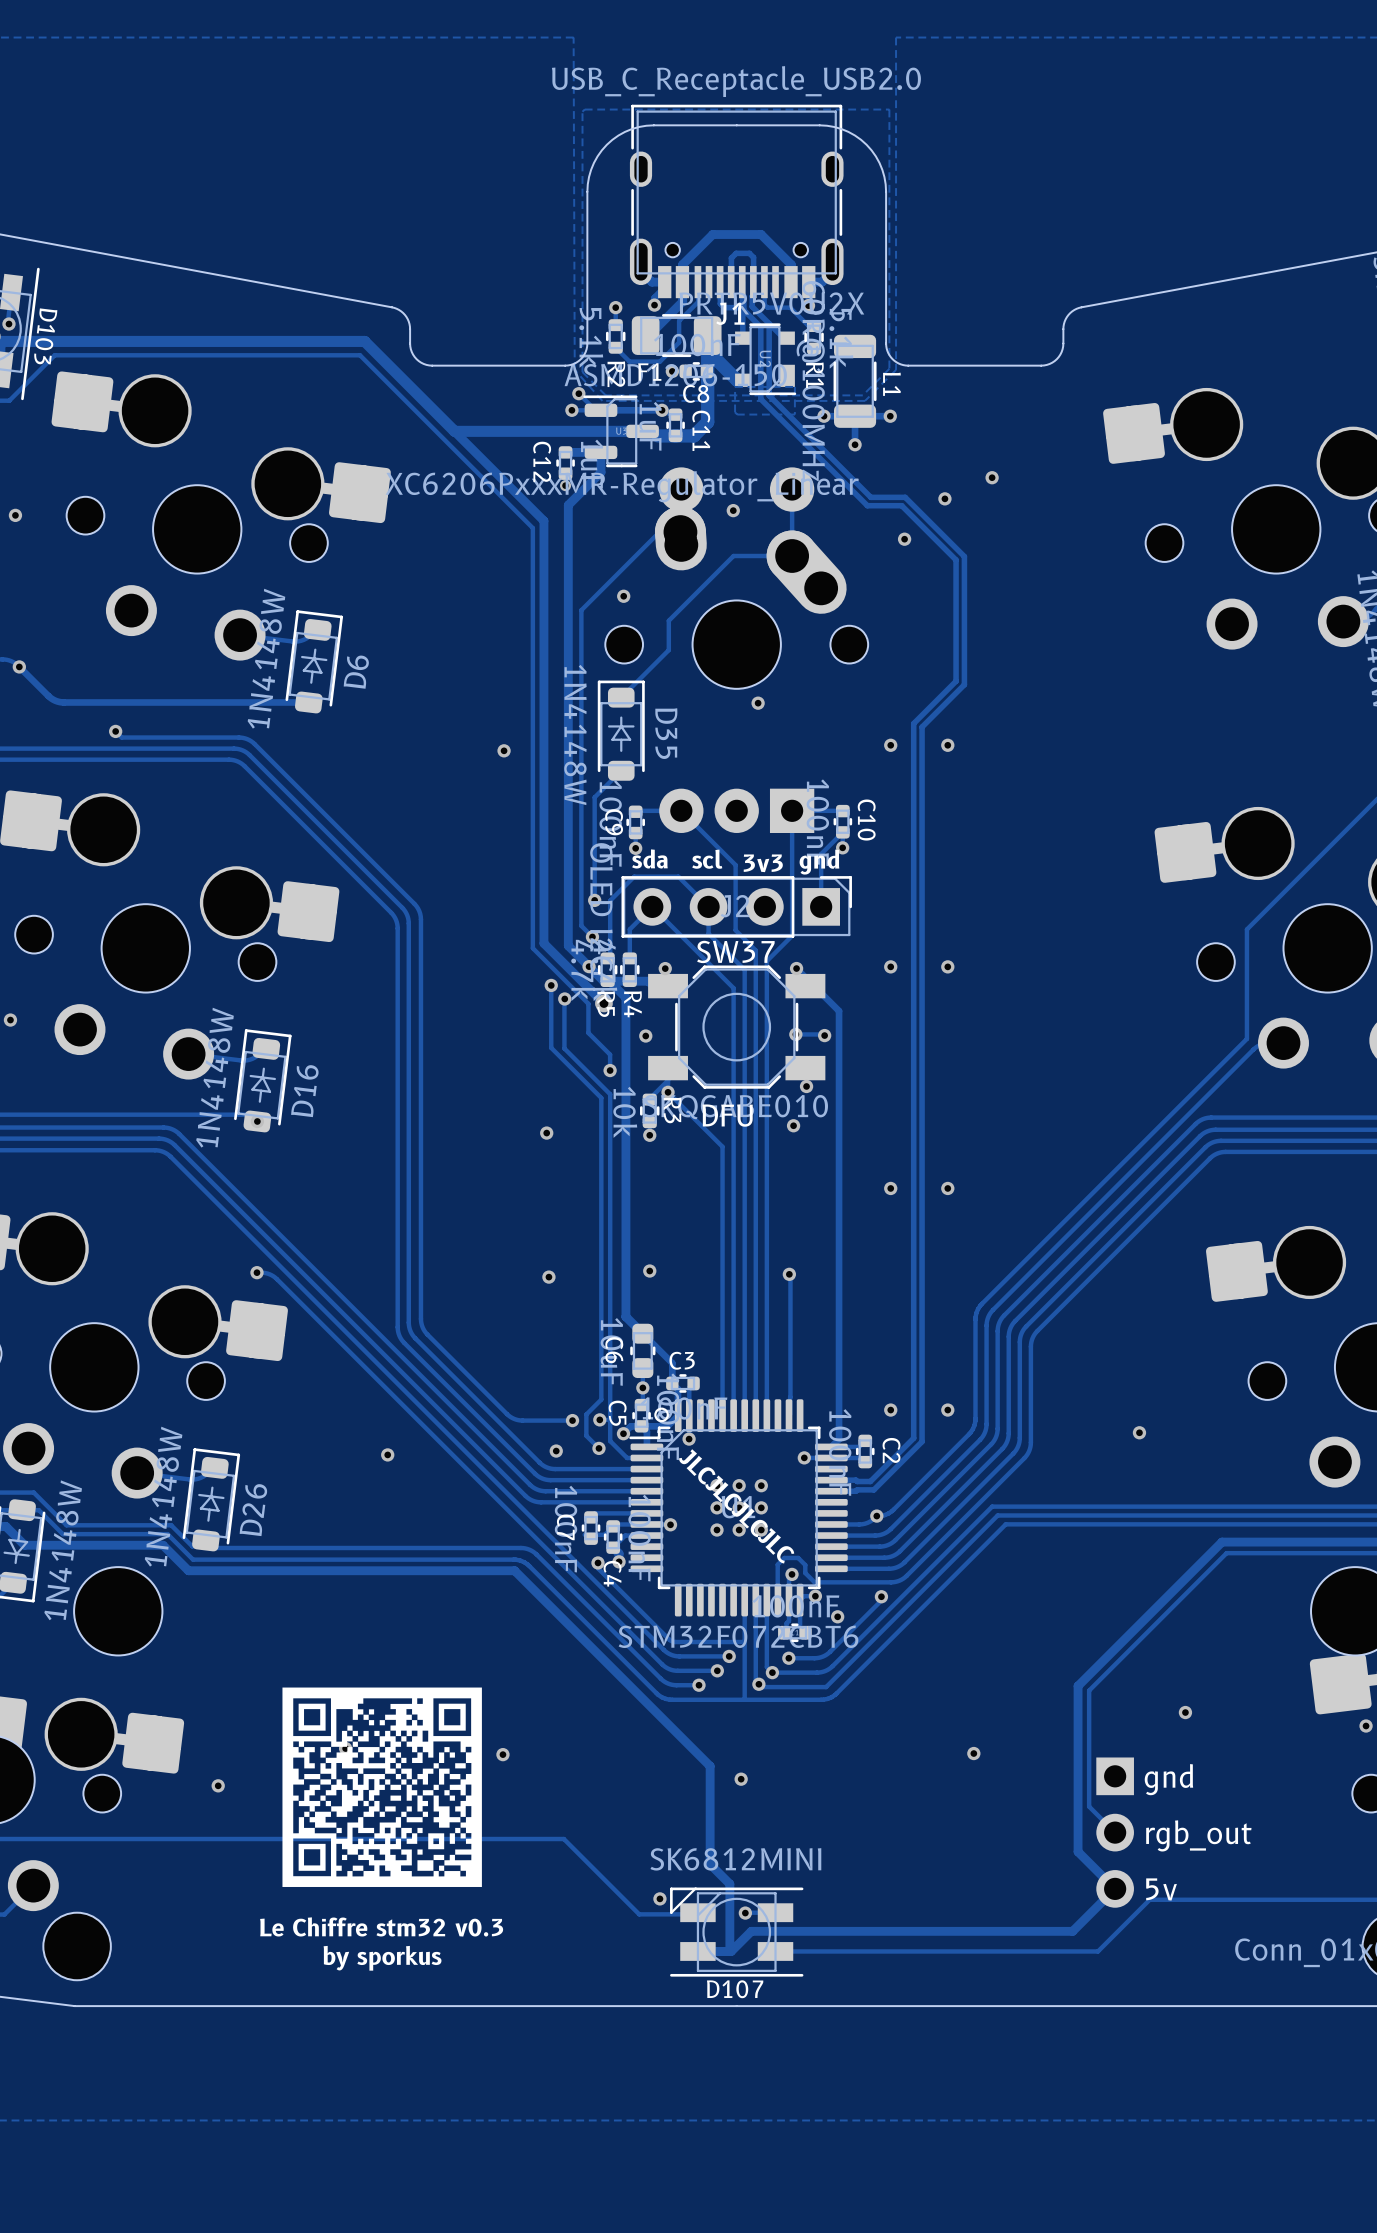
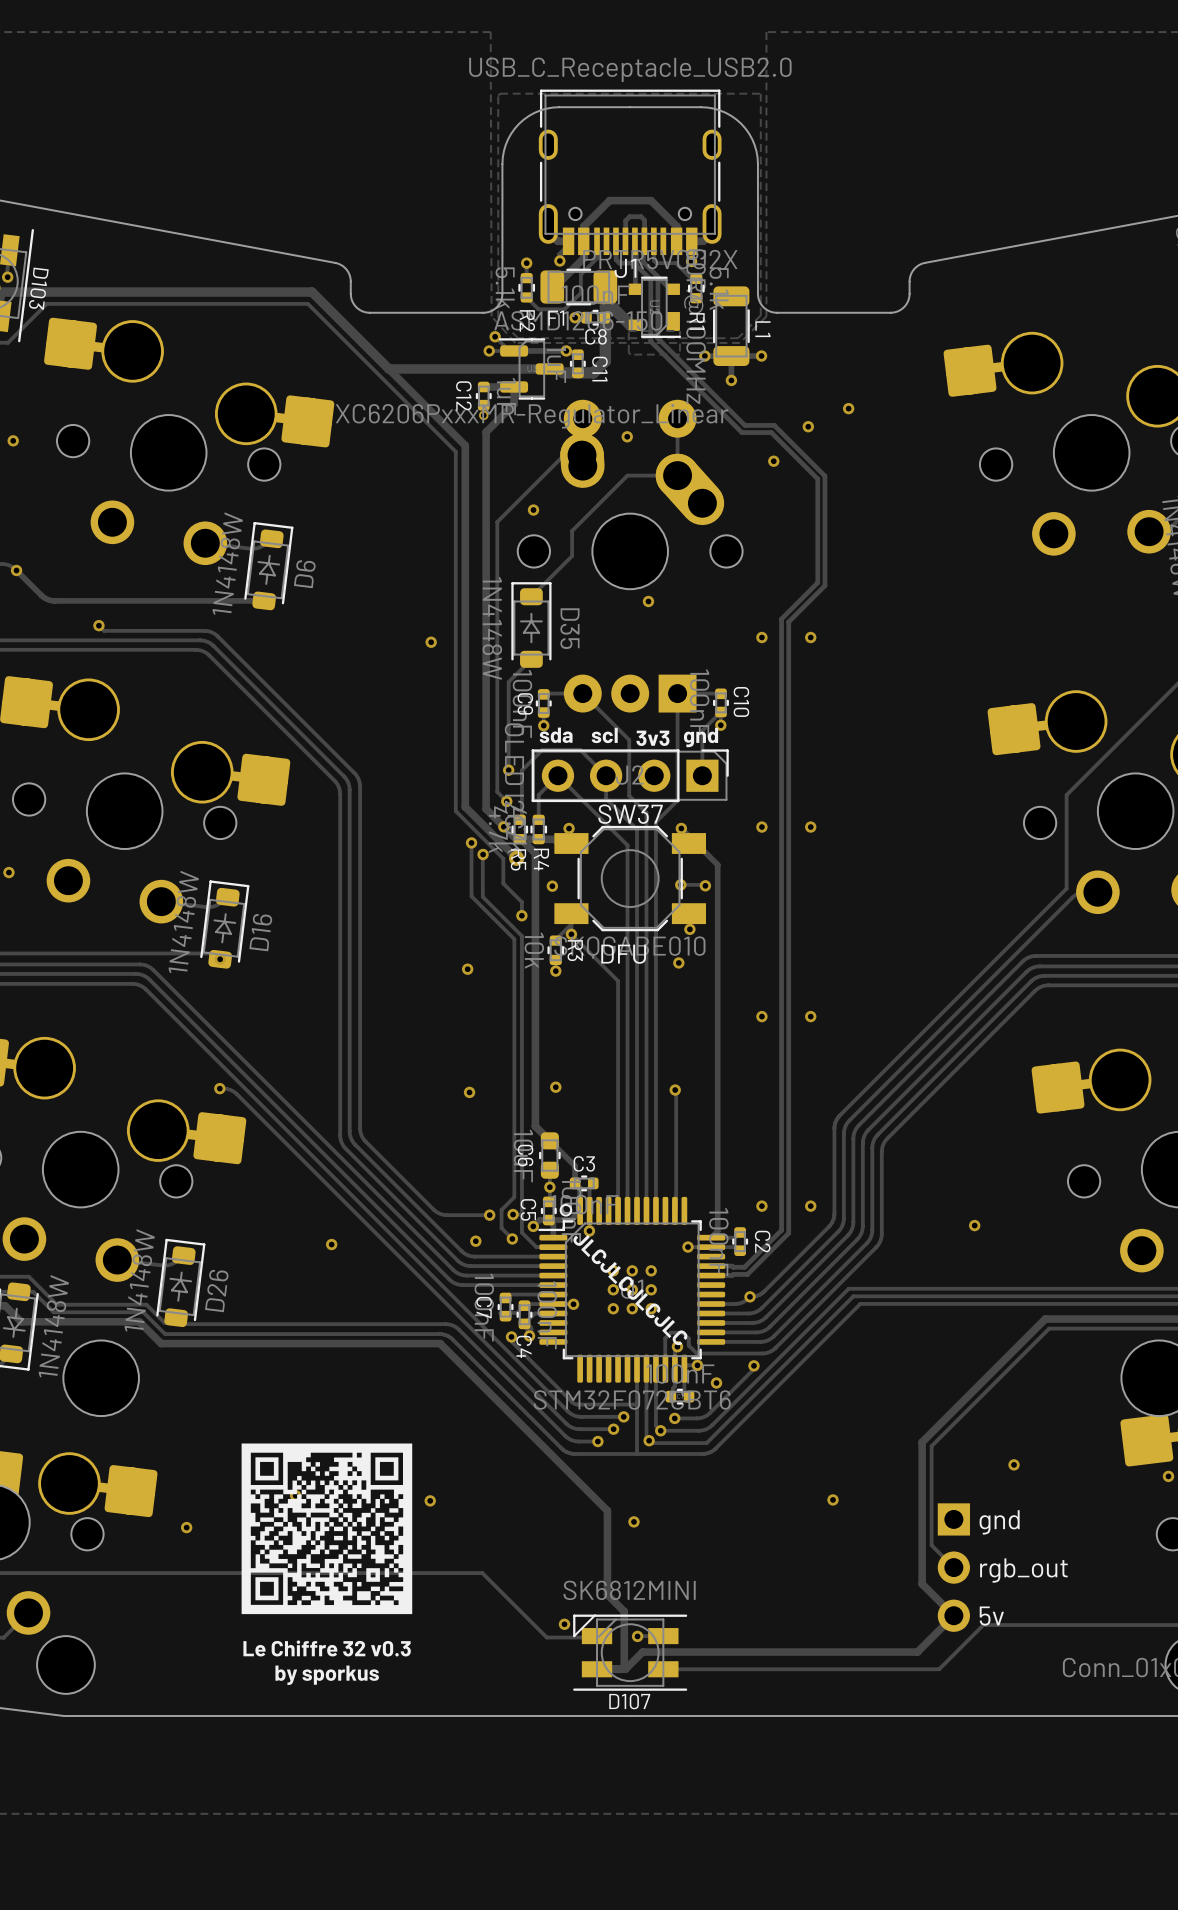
text: Le Chiffre stm32 v0.3 (381, 1926) -> Le Chiffre 32 v0.3 (327, 1648)

